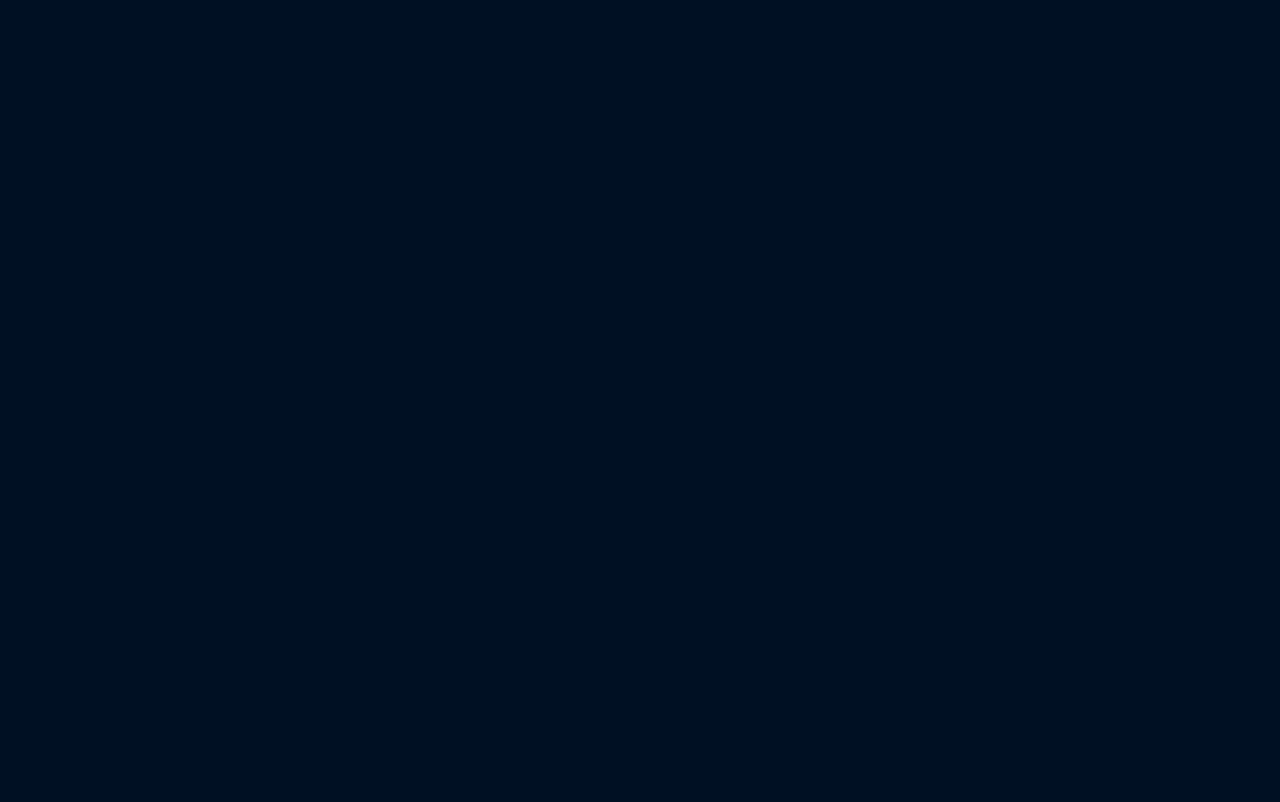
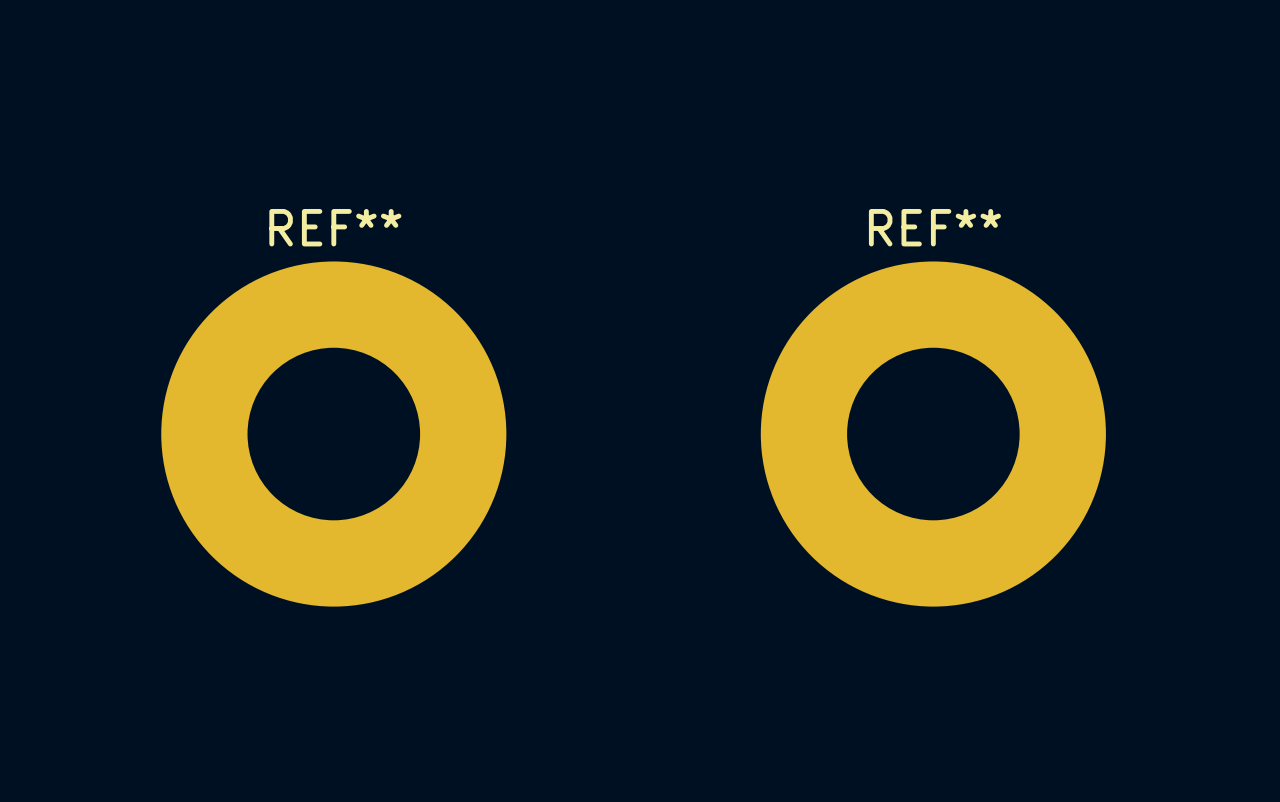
REF**: none -> (333, 434)
REF**: none -> (933, 434)

